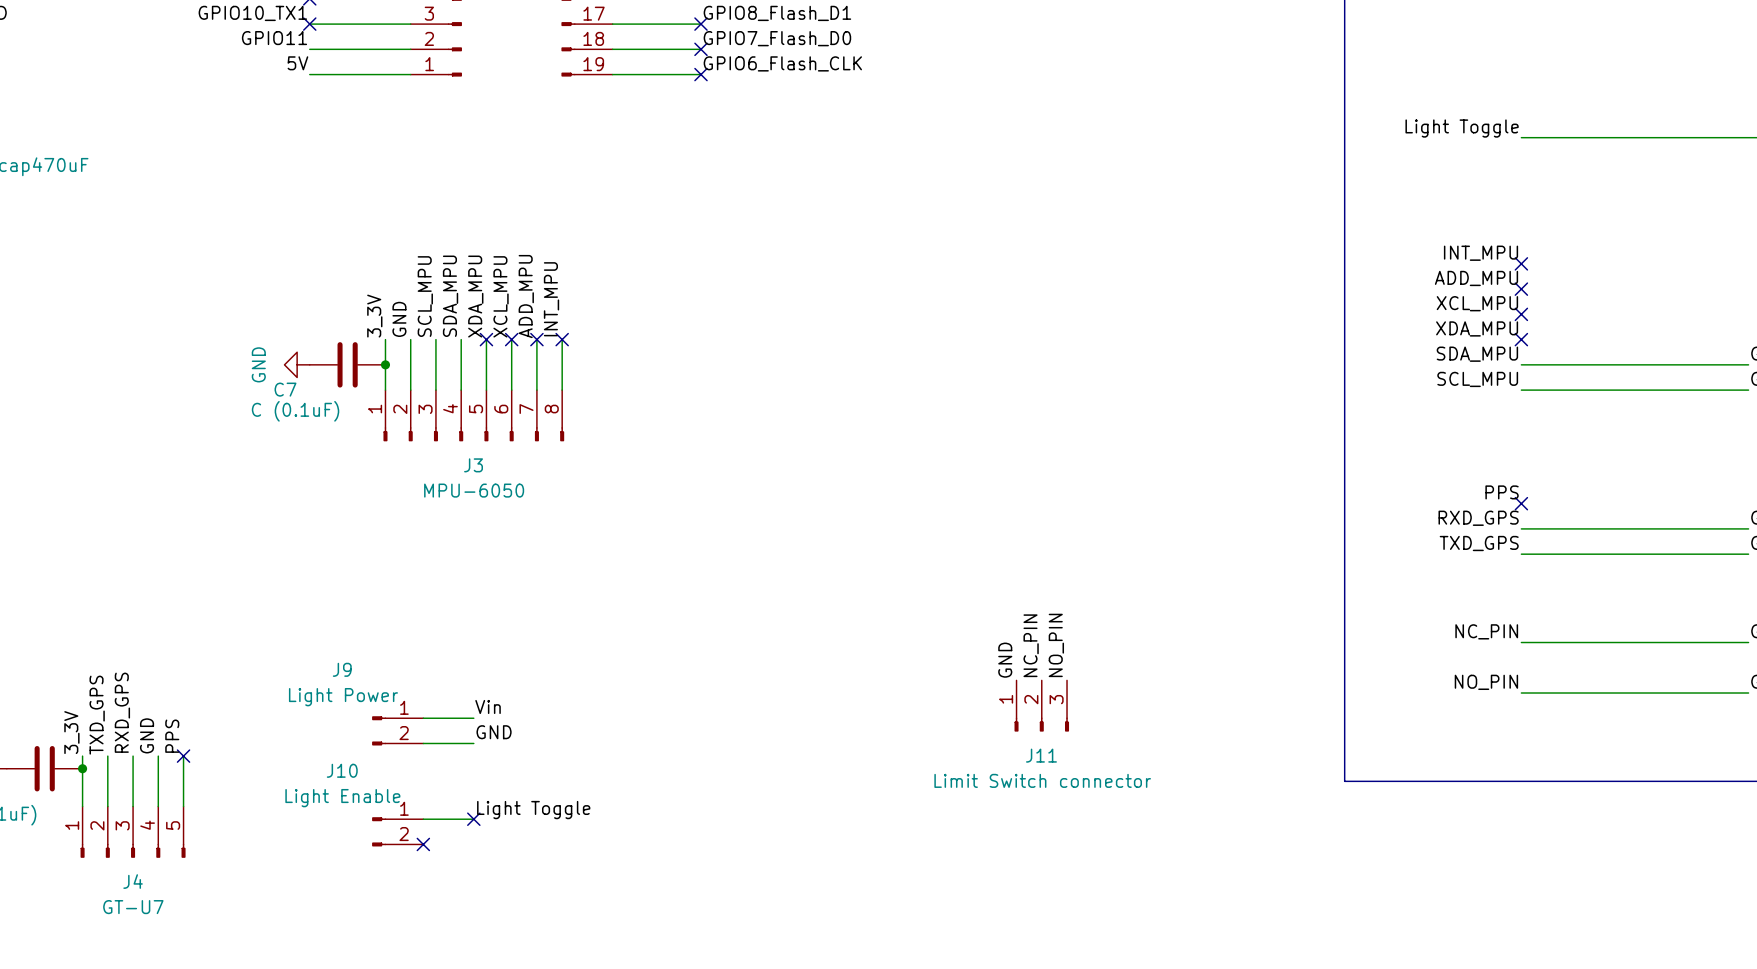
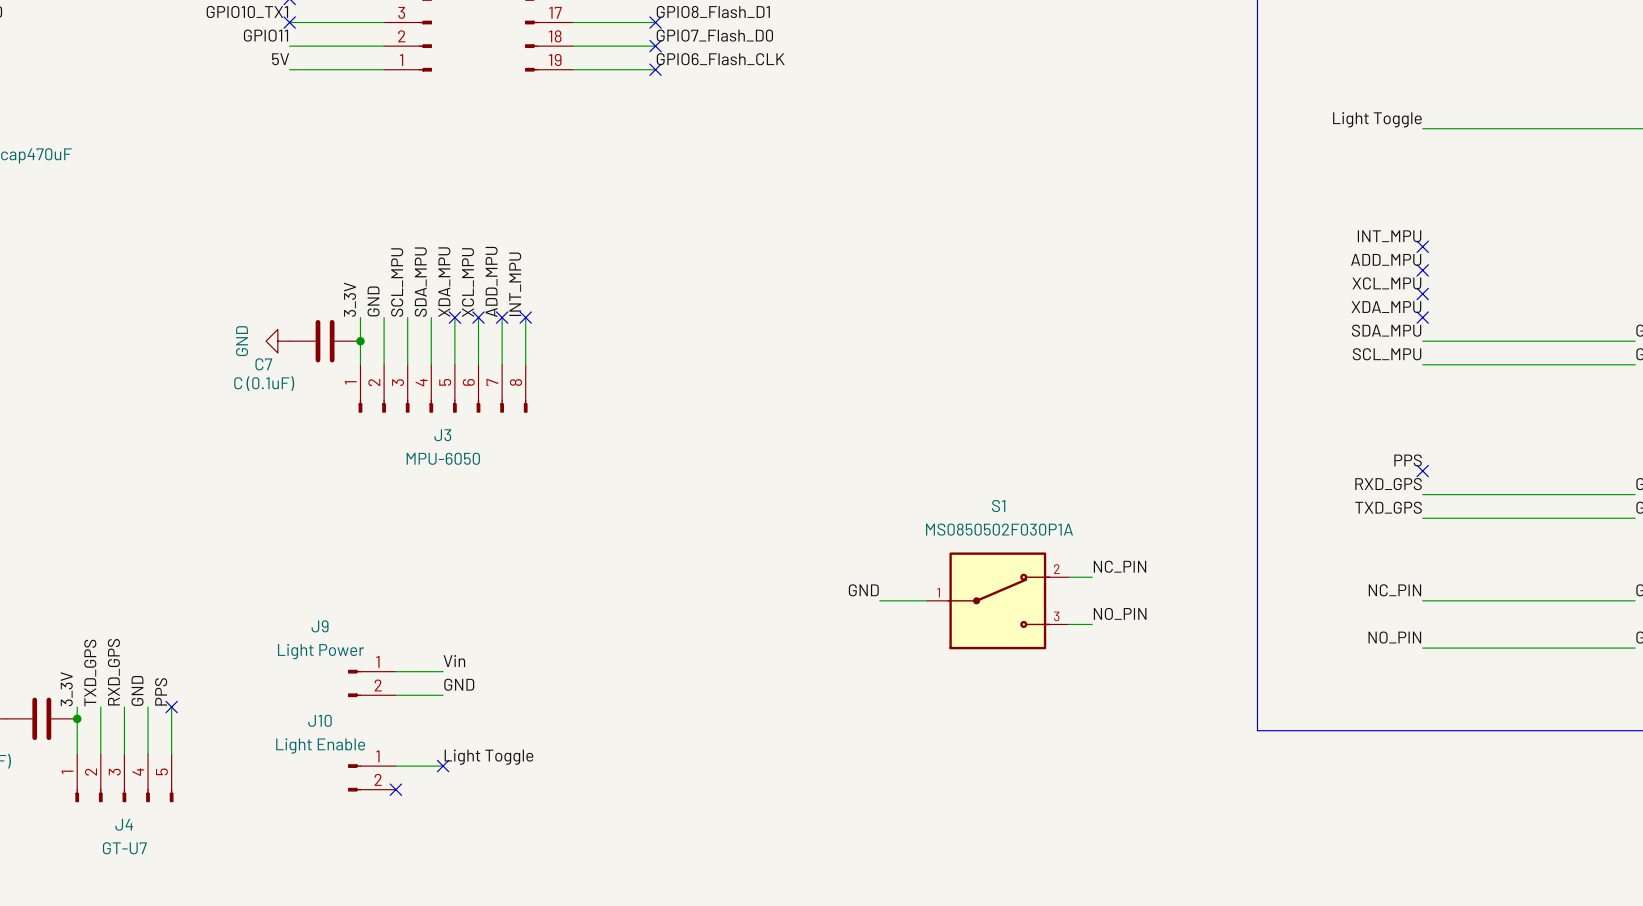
wire: none -> (1068, 577) (1092, 577)
wire: none -> (879, 600) (927, 600)
S1: none -> MS0850502F030P1A (997, 600)
label rotation: 0° (1031, 645) -> 90° clockwise (1120, 566)
label position: NC_PIN (1031, 645) -> NC_PIN (1120, 566)
label rotation: 0° (1056, 645) -> 90° clockwise (1120, 613)
label position: NO_PIN (1056, 645) -> NO_PIN (1120, 613)
label rotation: 0° (1005, 660) -> 90° clockwise (863, 590)
label position: GND (1005, 660) -> GND (863, 590)
wire: none -> (1068, 624) (1092, 624)
J11: Limit Switch connector (1041, 706) -> none

